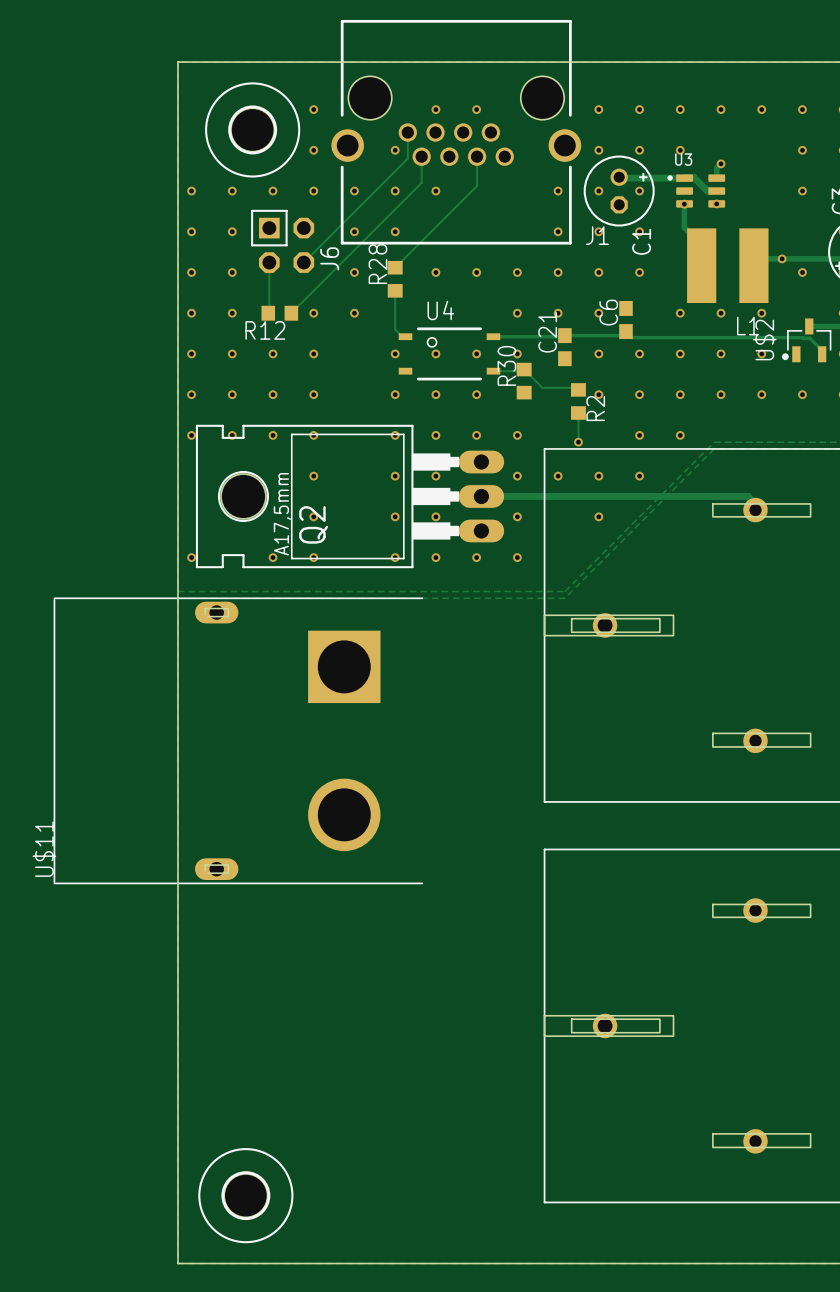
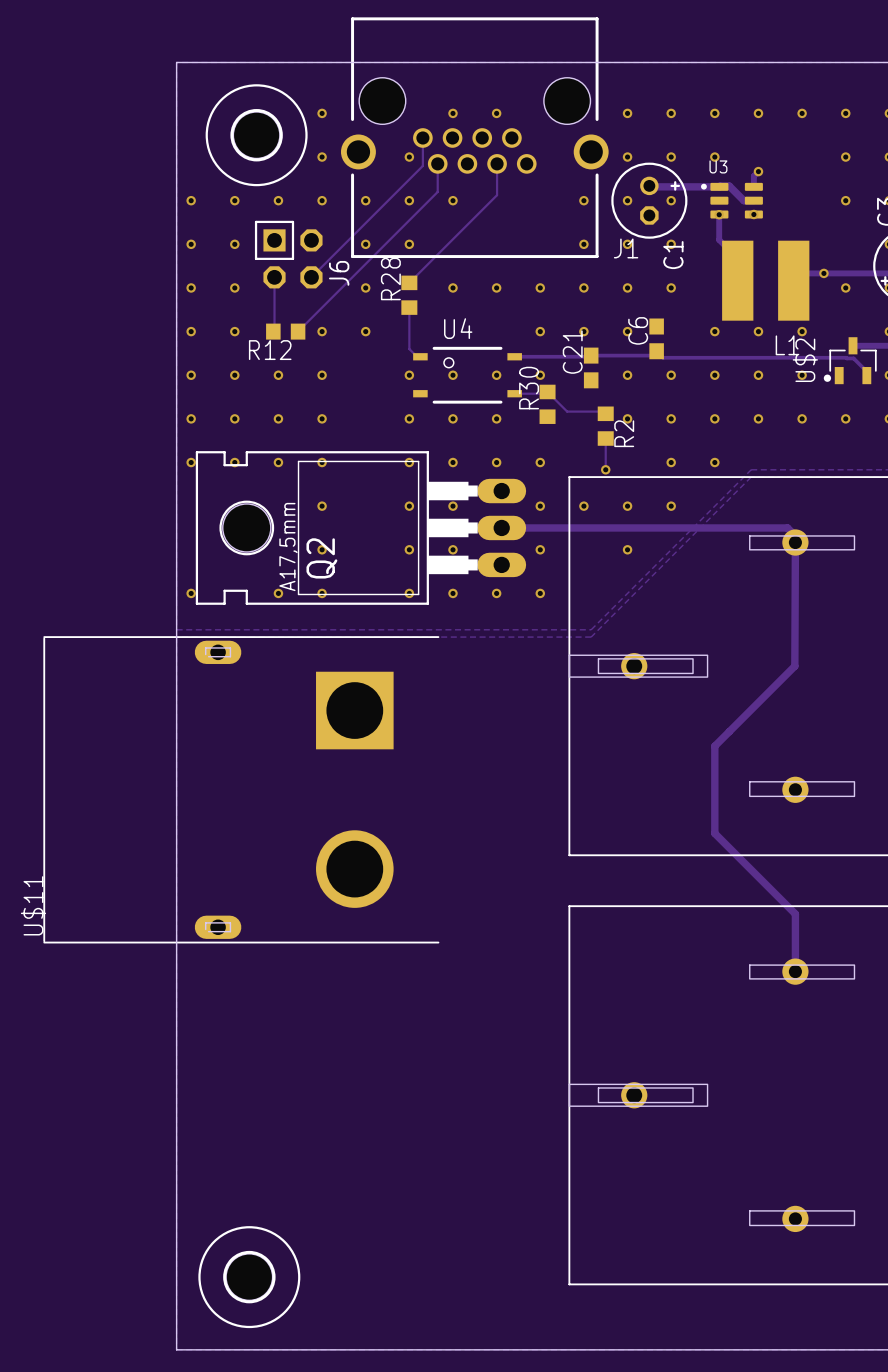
track: none -> (795, 542) (794, 666) (714, 746) (714, 833) (795, 914) (795, 971)

